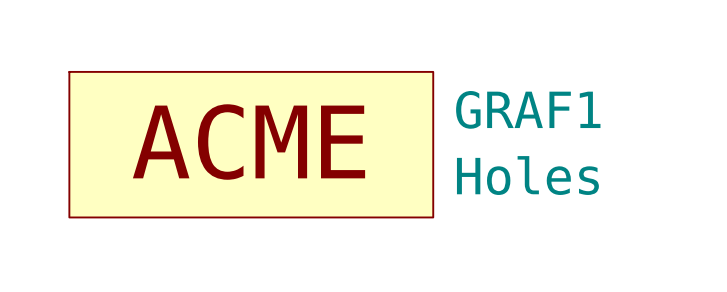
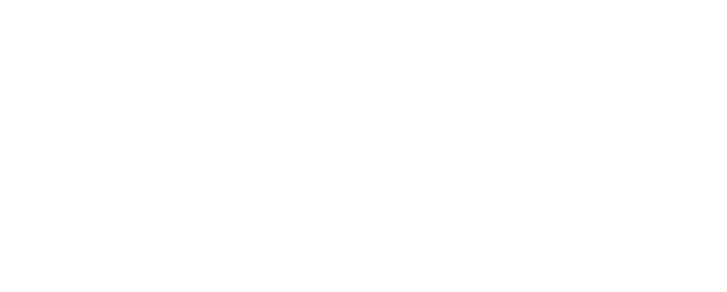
GRAF1: Holes (251, 144) -> none

